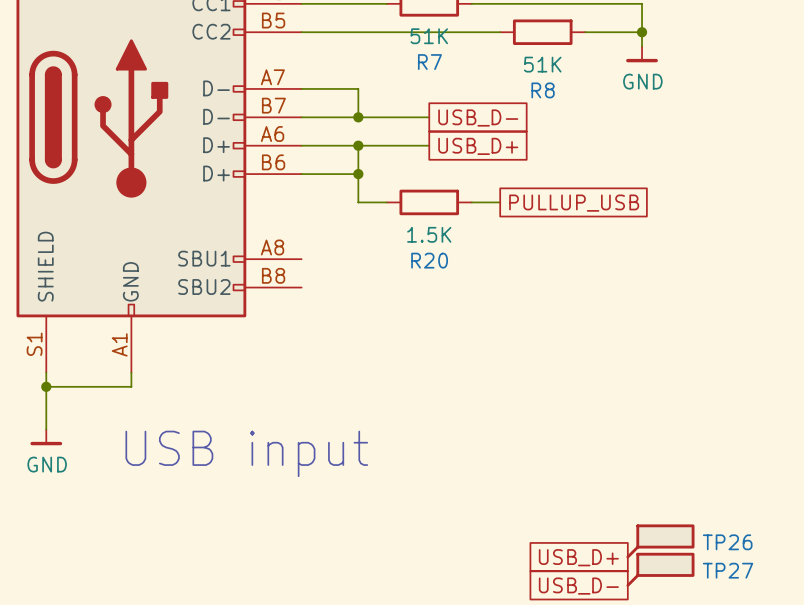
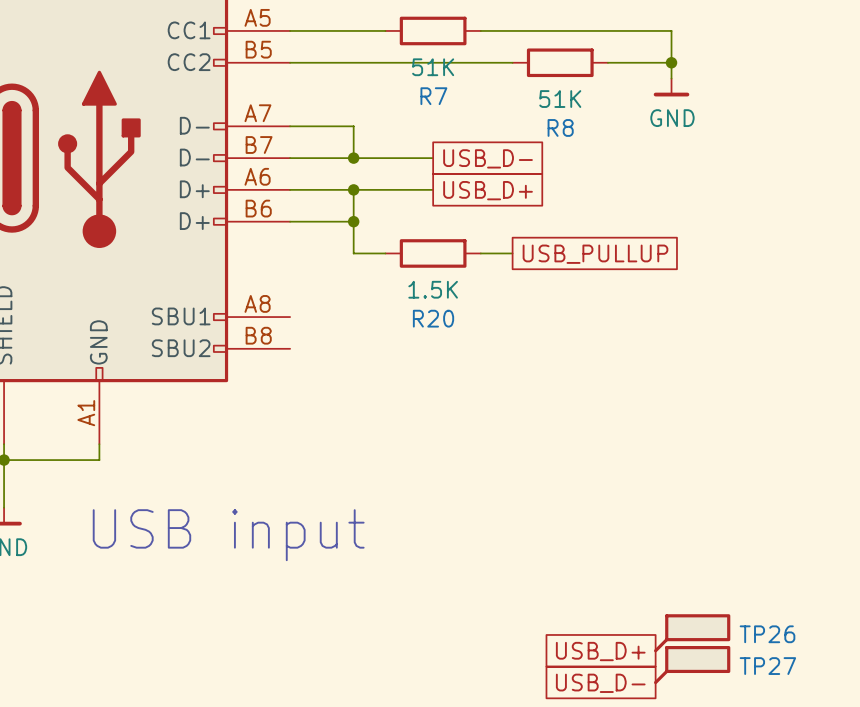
global label: PULLUP_USB (574, 203) -> USB_PULLUP (595, 254)

